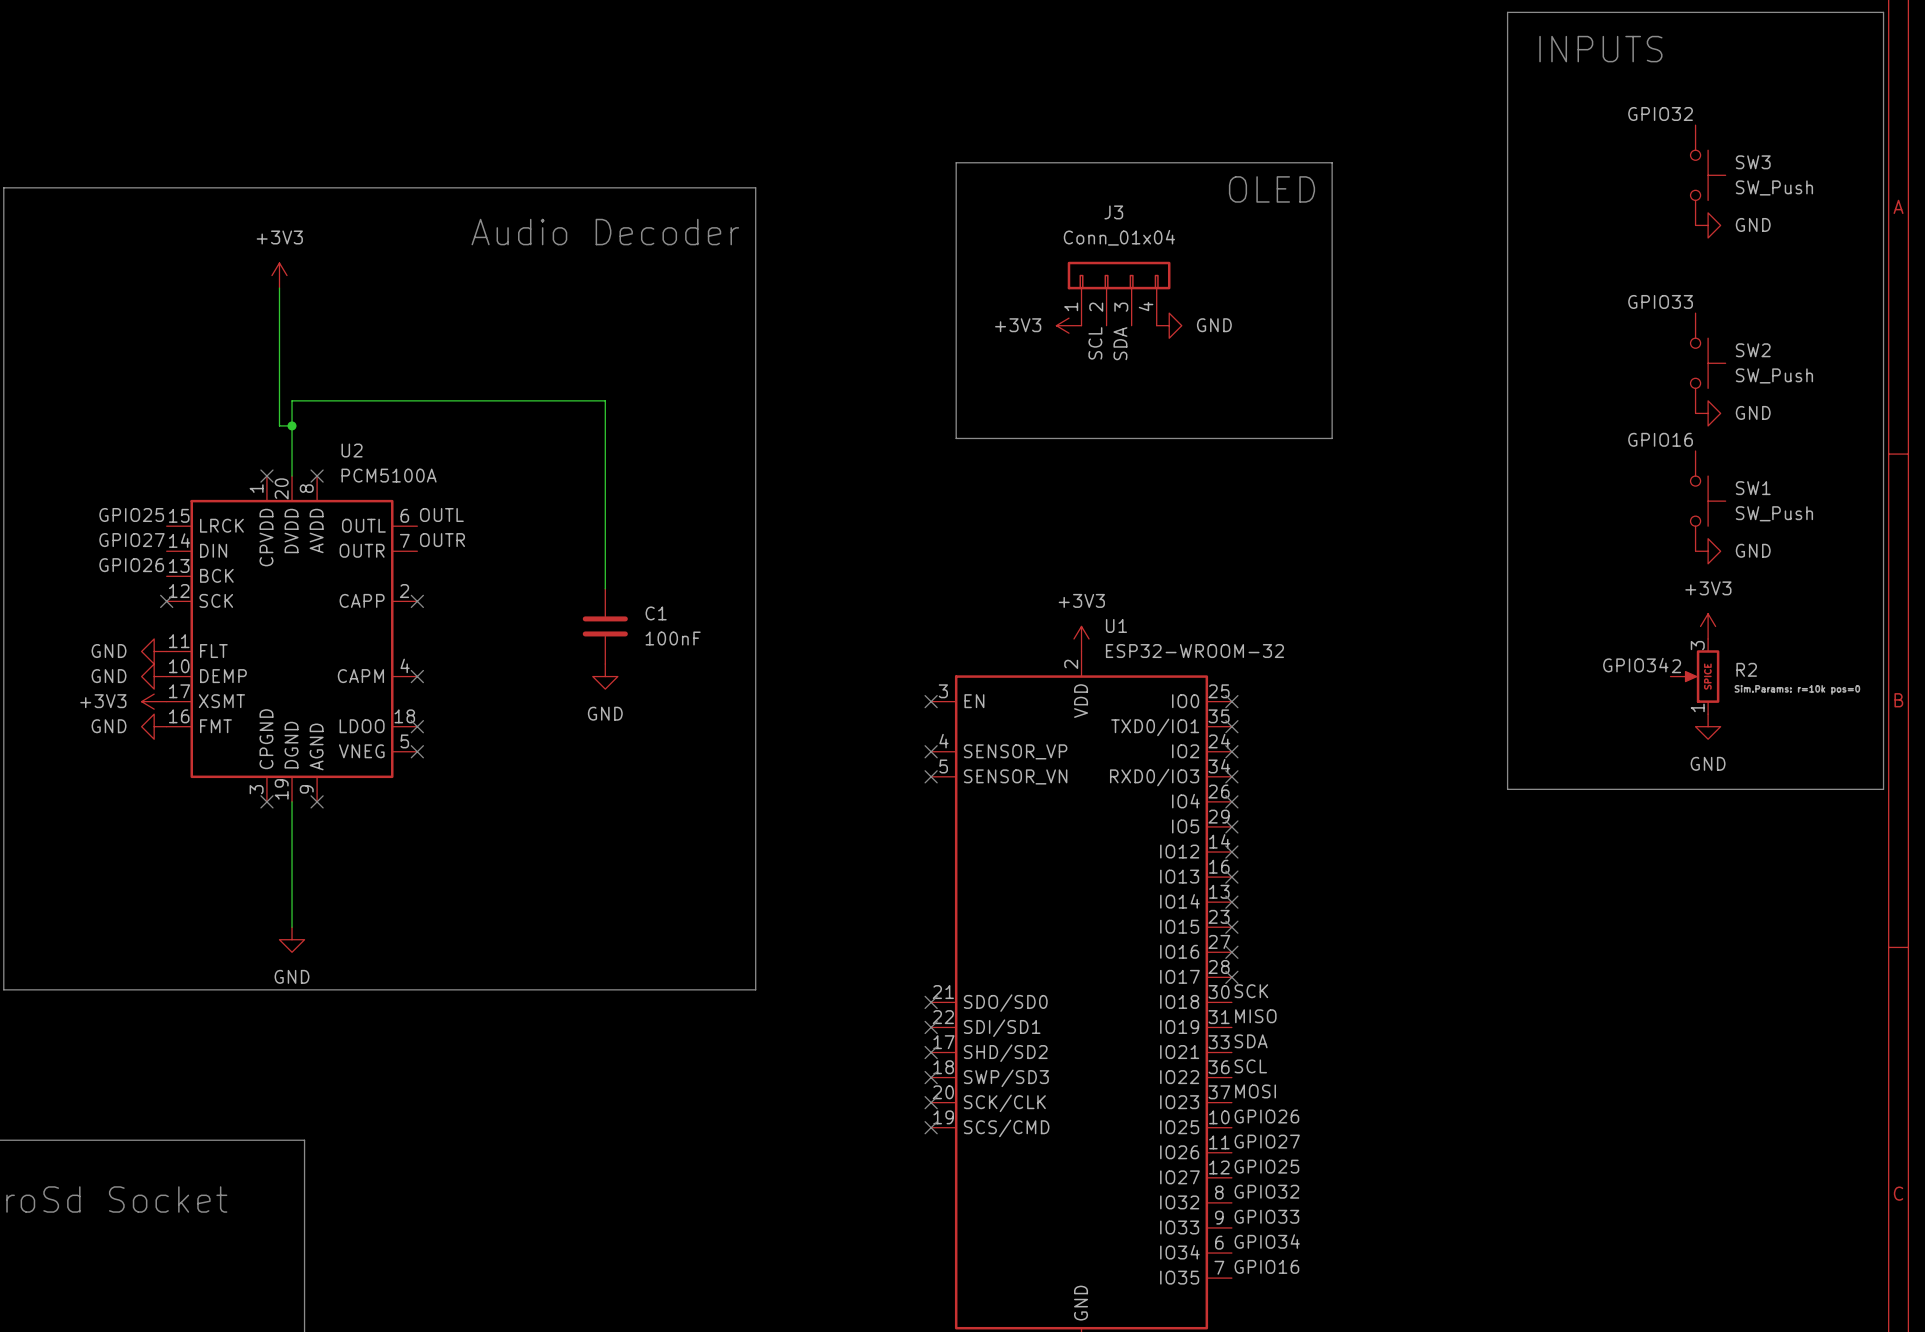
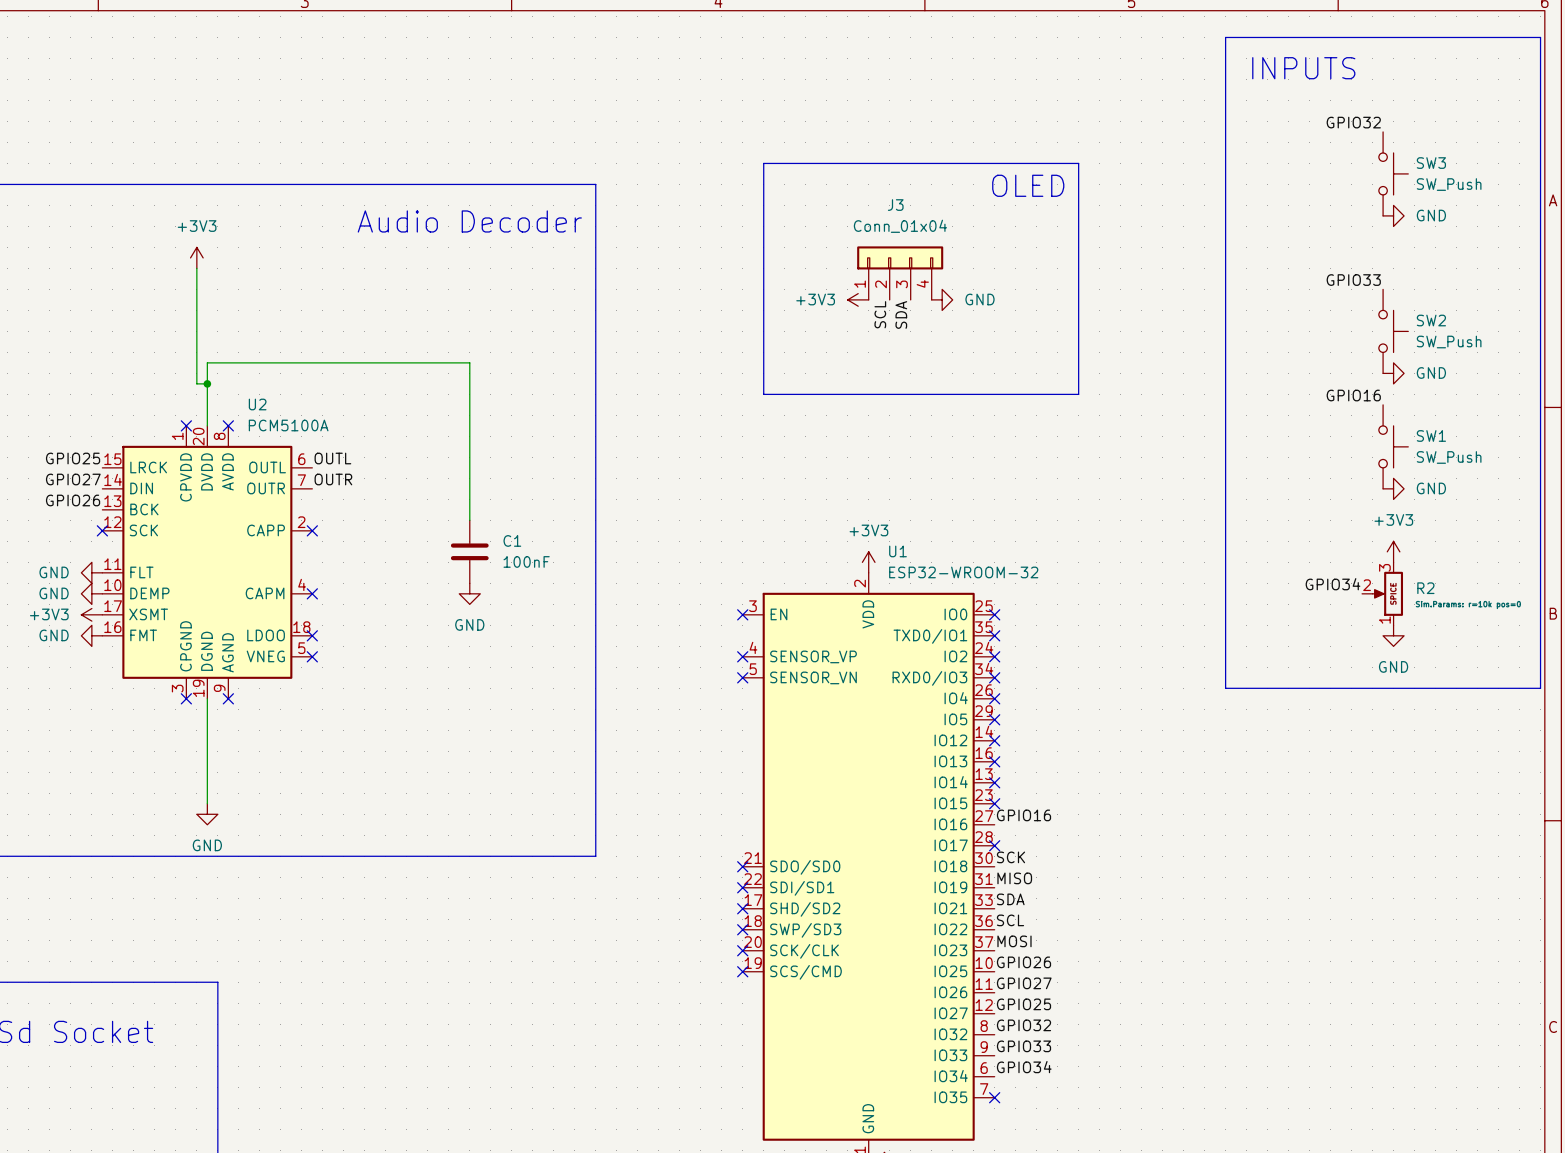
label: none -> GPIO16 (1023, 815)
no-connect mark: (1231, 952) -> none
label: GPIO16 (1266, 1266) -> none
no-connect mark: none -> (994, 1097)

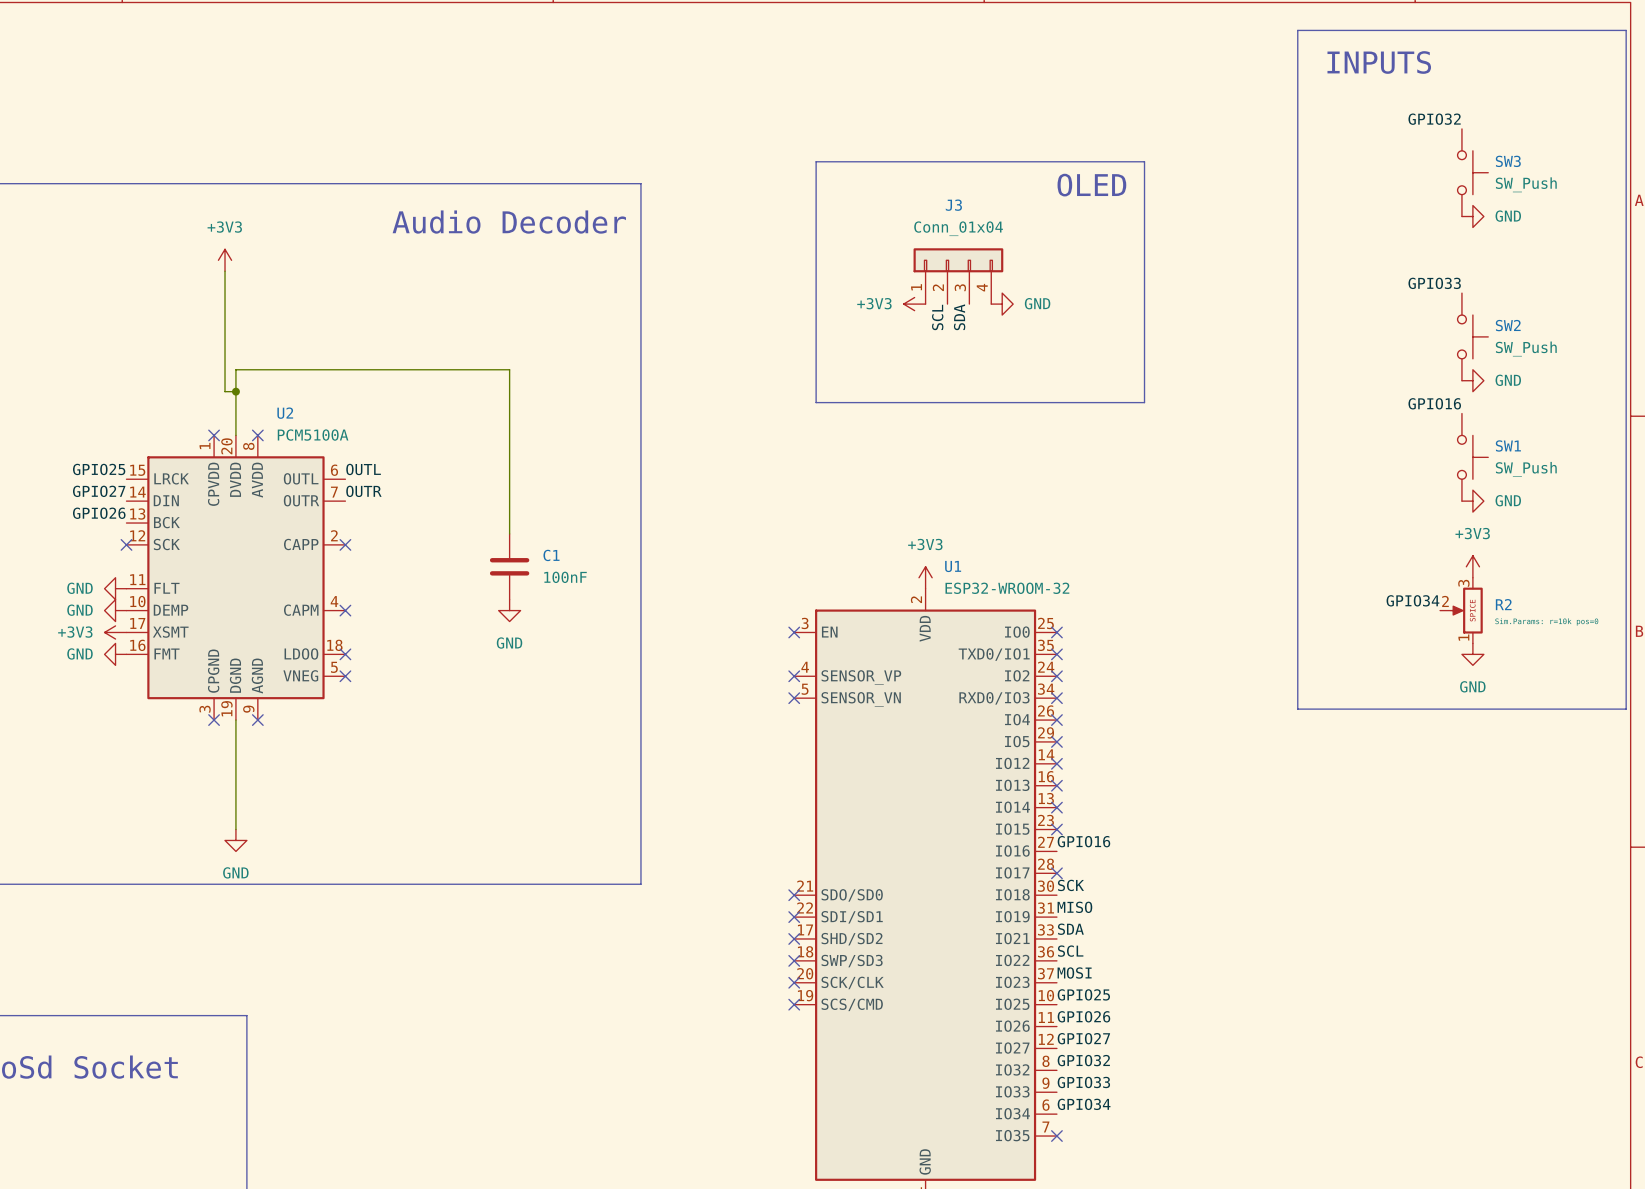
label: GPIO26 (1023, 962) -> GPIO25 (1083, 994)
label: GPIO27 (1024, 983) -> GPIO26 (1083, 1016)
label: GPIO25 (1023, 1004) -> GPIO27 (1083, 1038)

